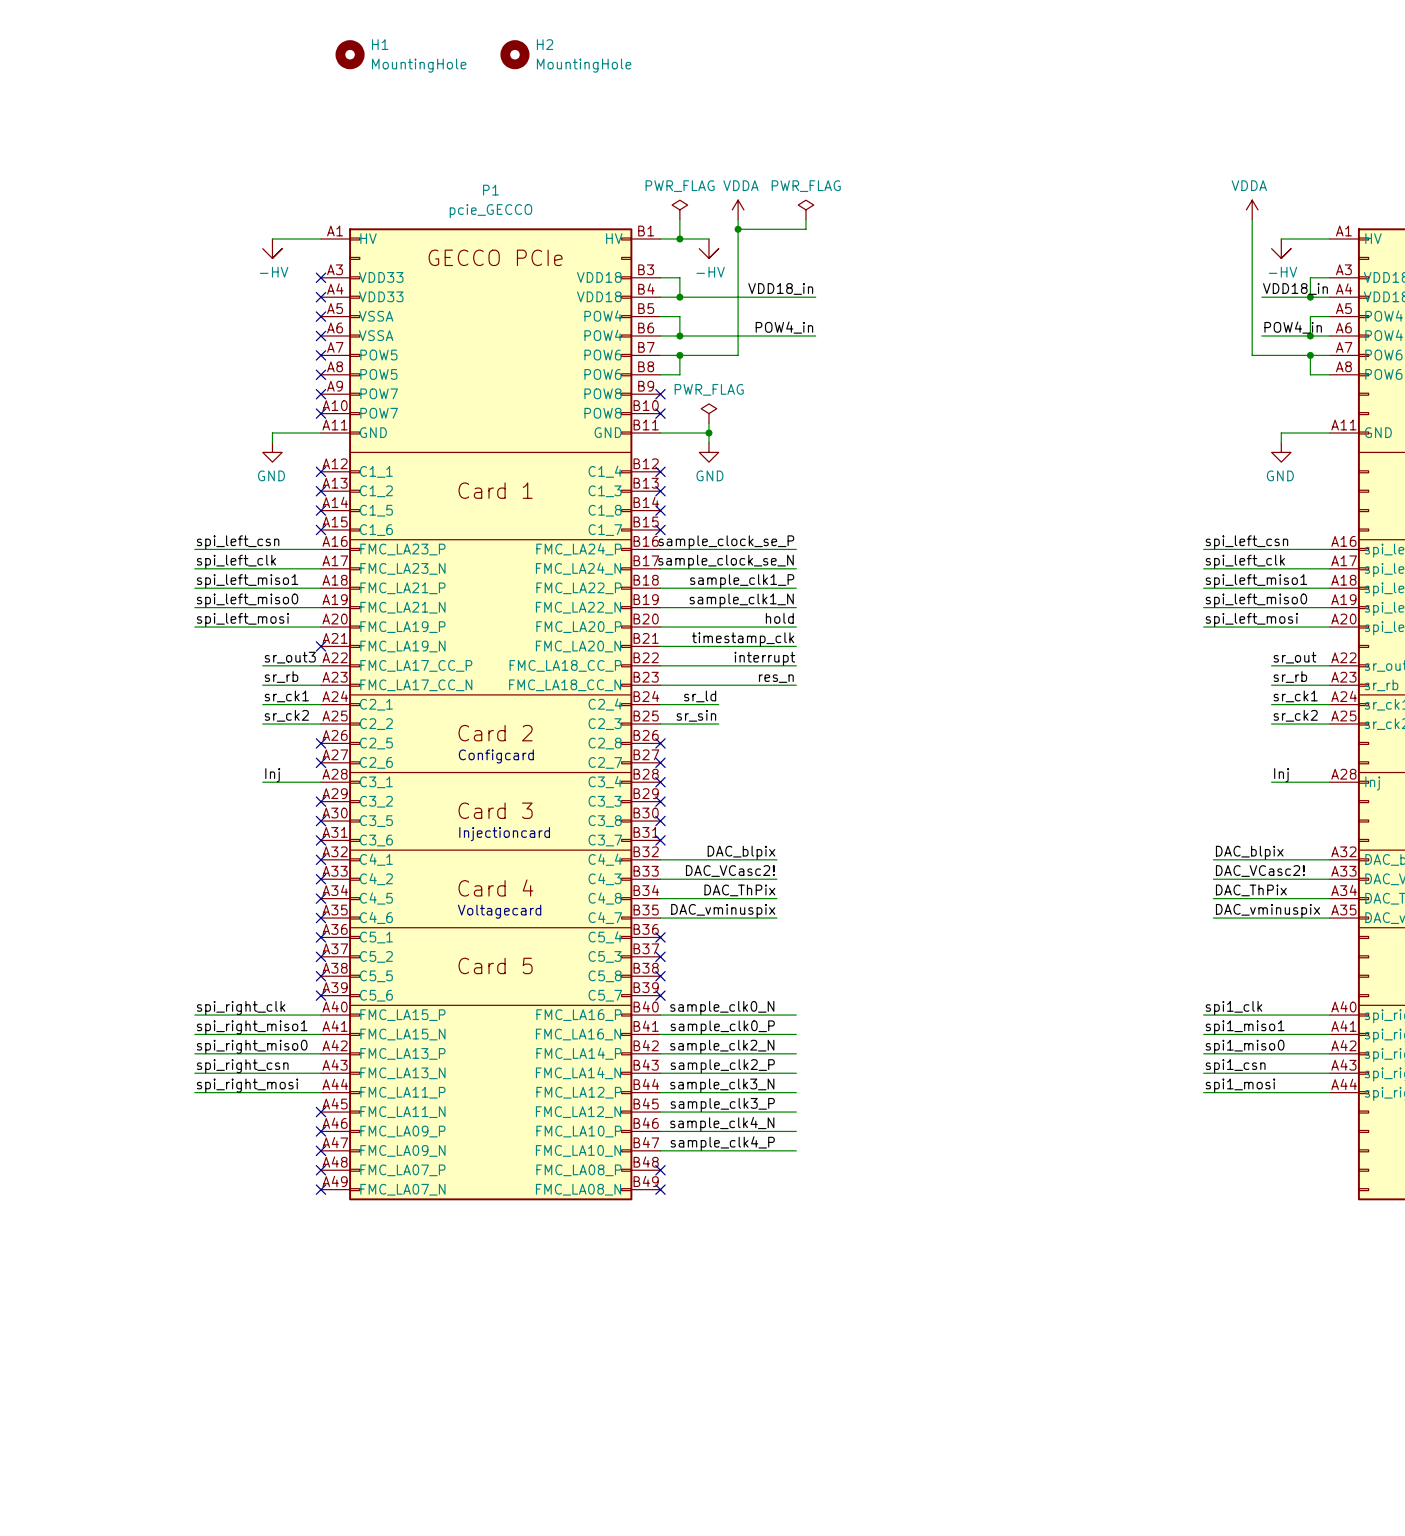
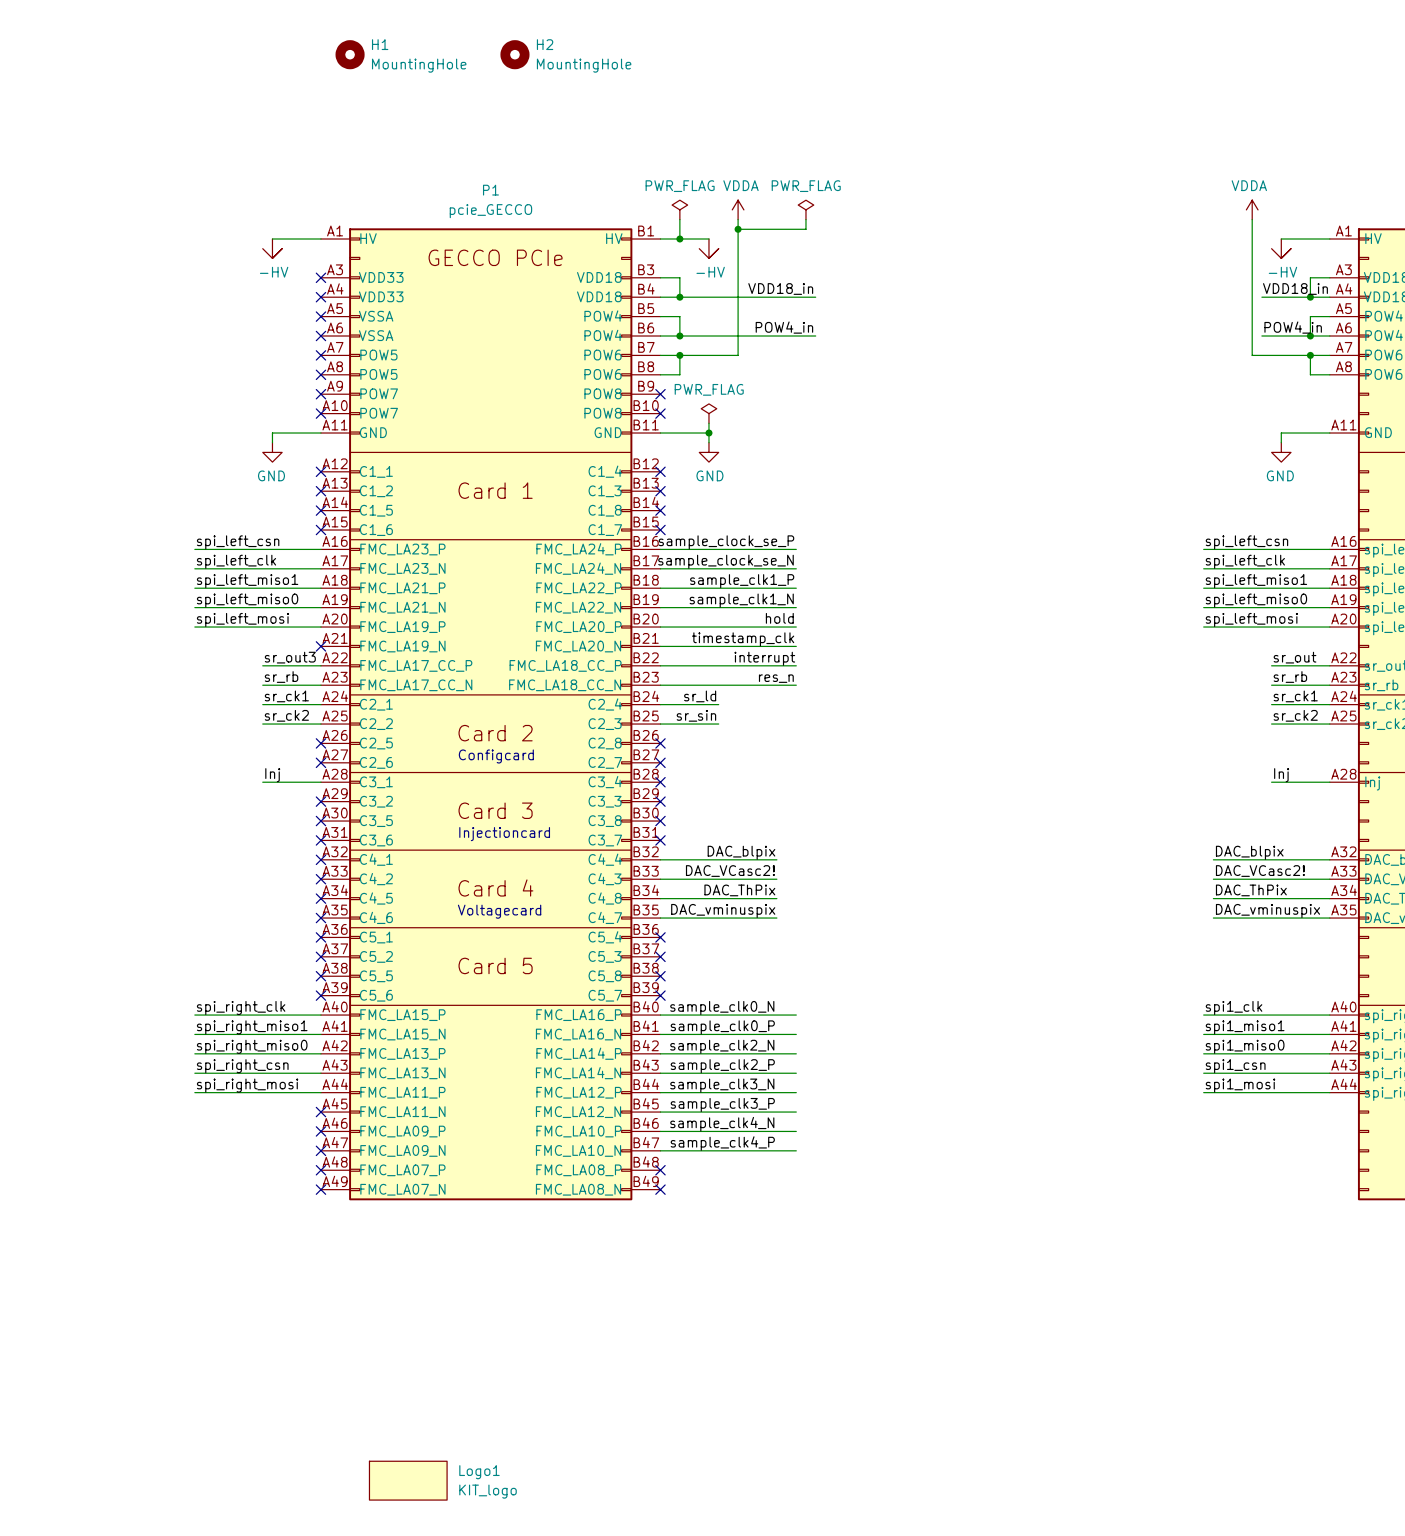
Logo1: none -> KIT_logo (408, 1480)

